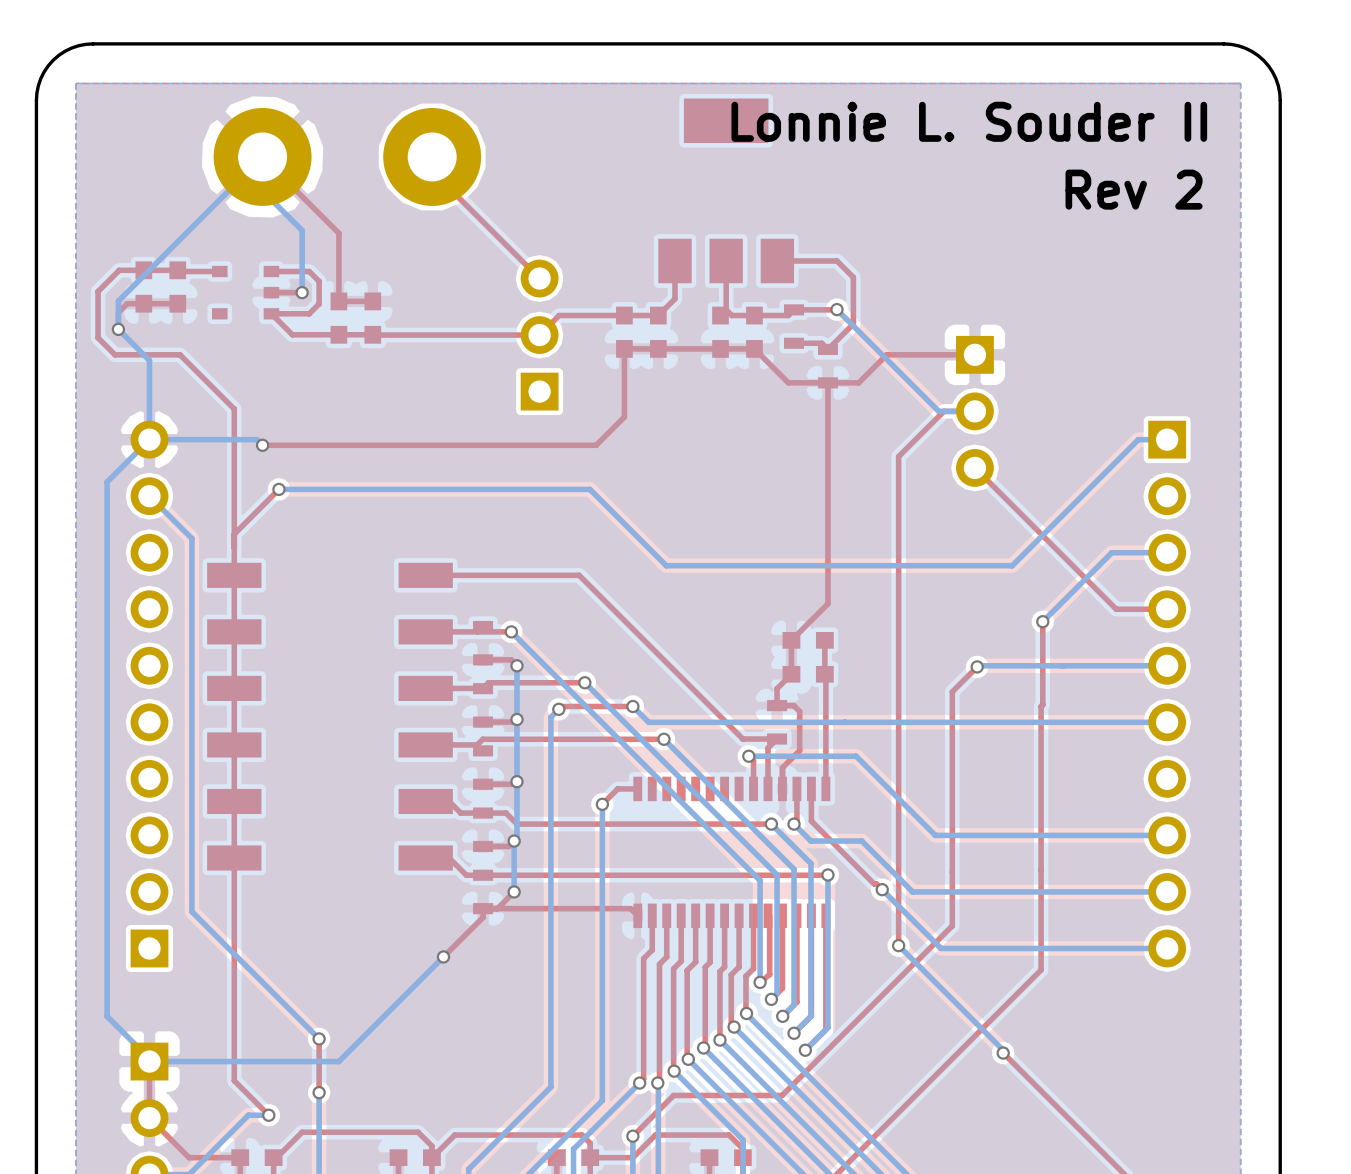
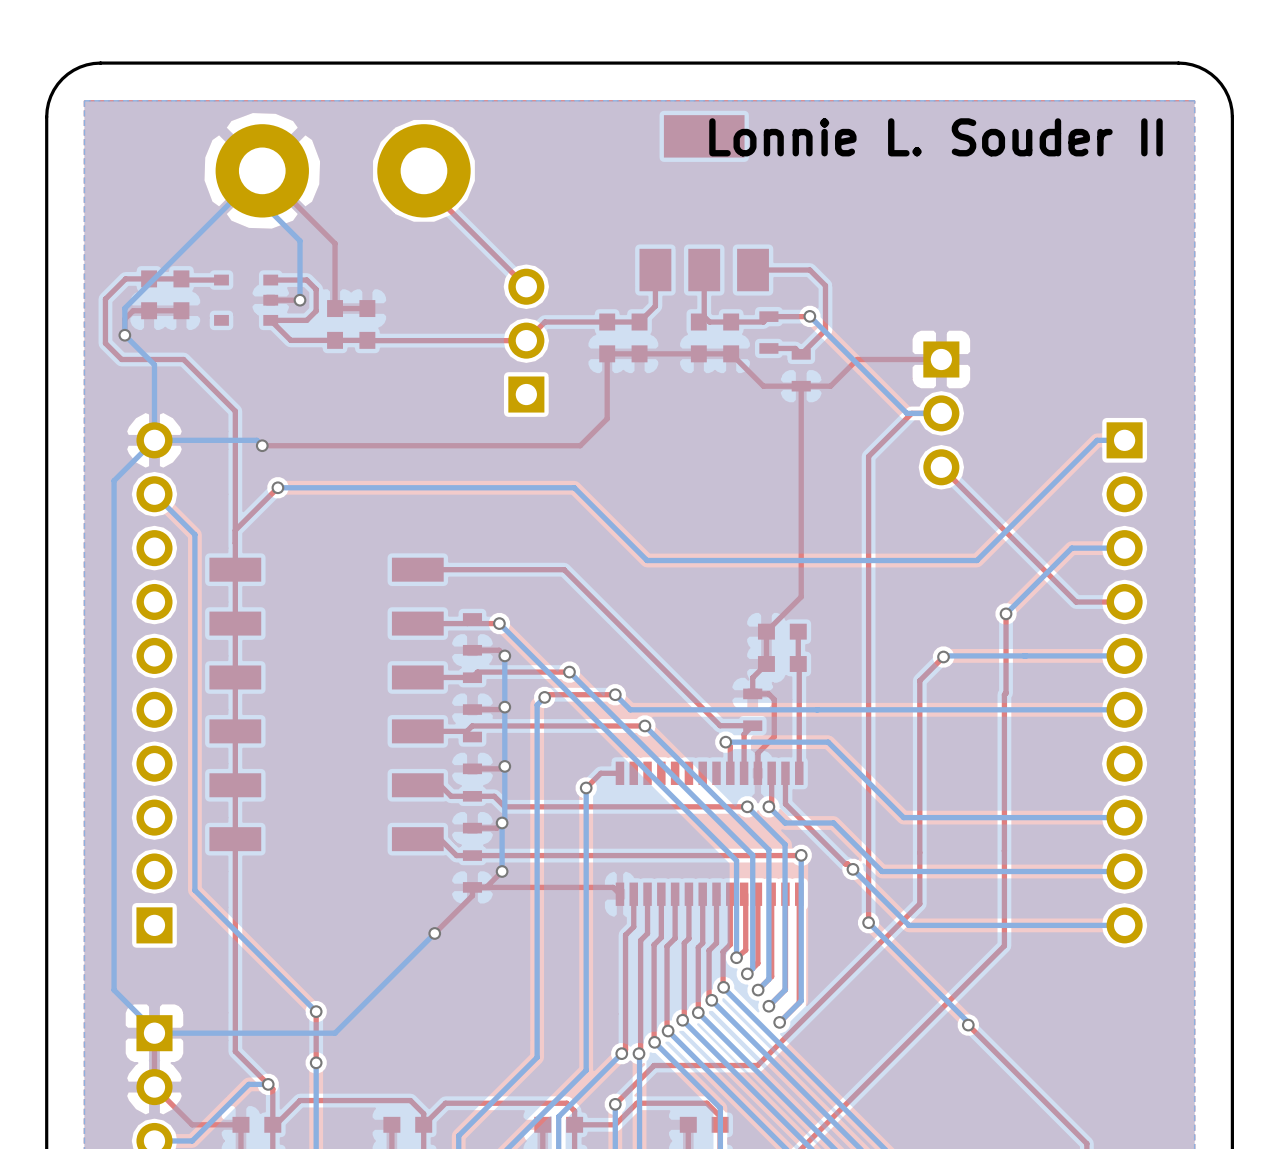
text: Rev 2 (1134, 189) -> none
top track: none -> (268, 1084) (272, 1088) (272, 1124)

